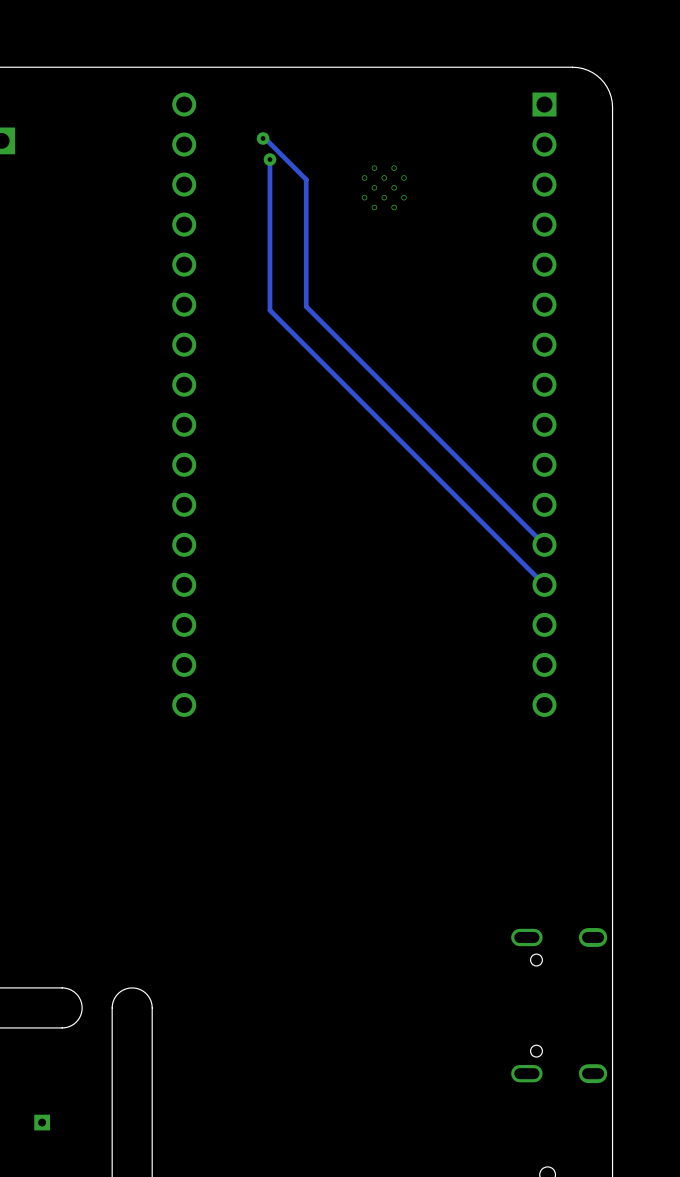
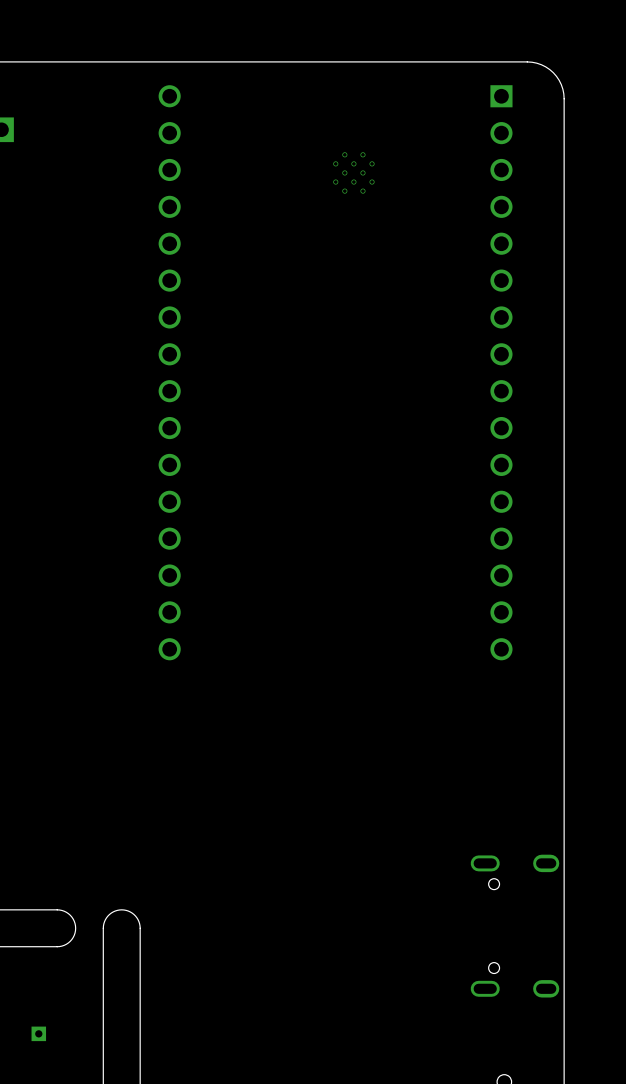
track: (263, 138) (306, 179) (306, 306) (544, 544) -> none
via: (263, 138) -> none
track: (269, 159) (269, 310) (544, 584) -> none
via: (269, 159) -> none

